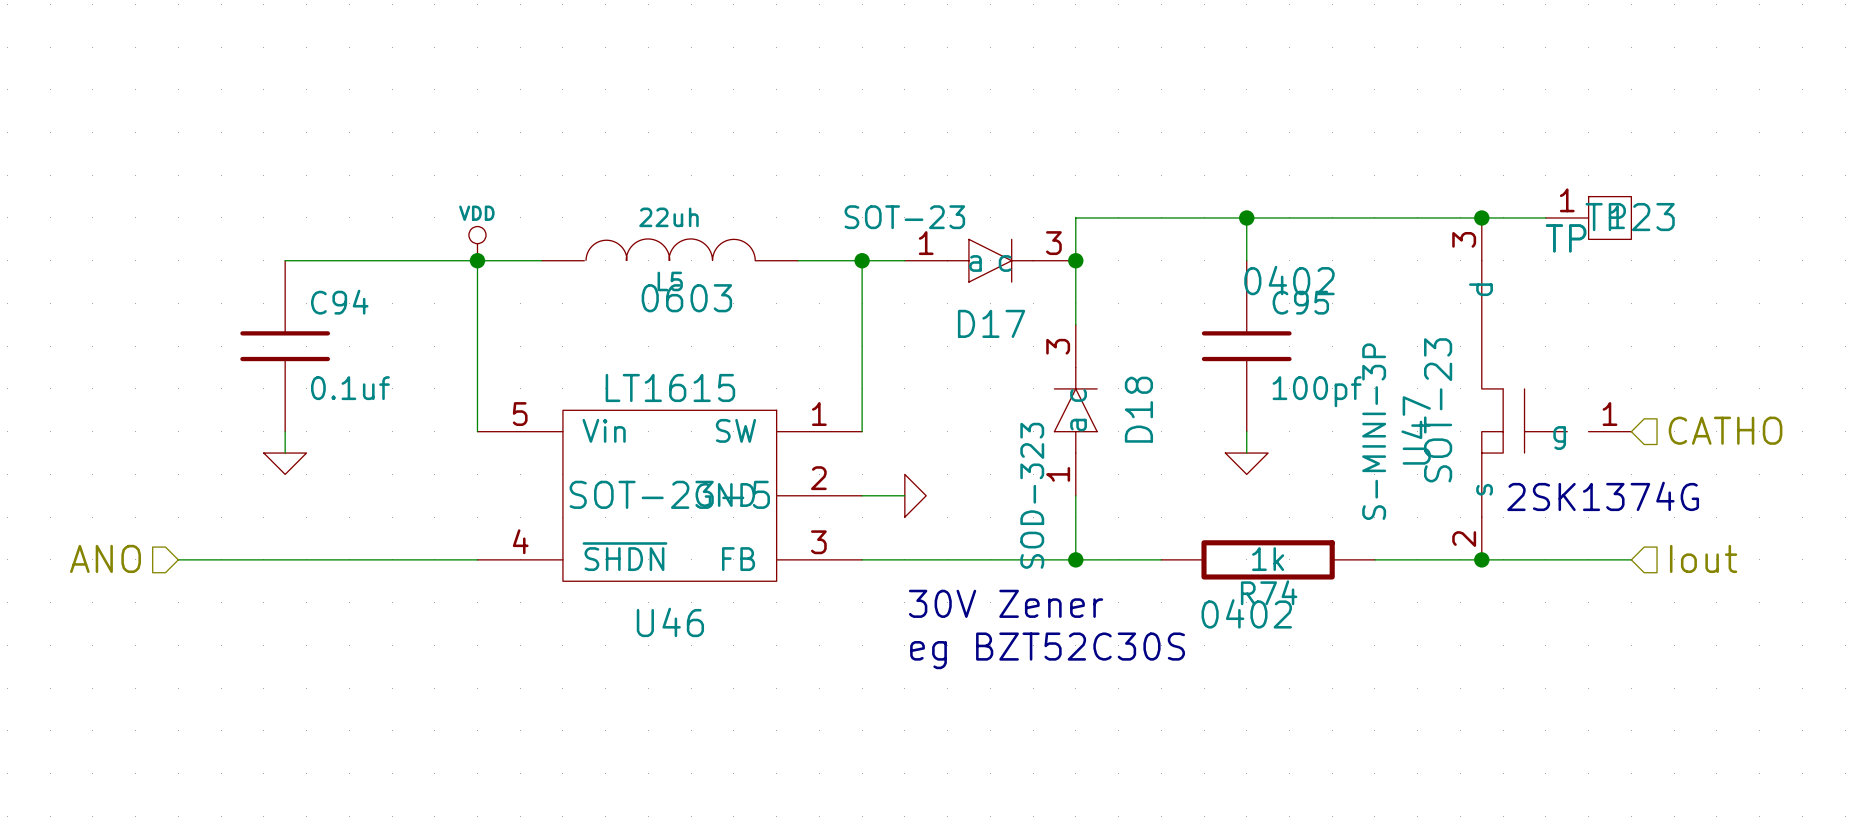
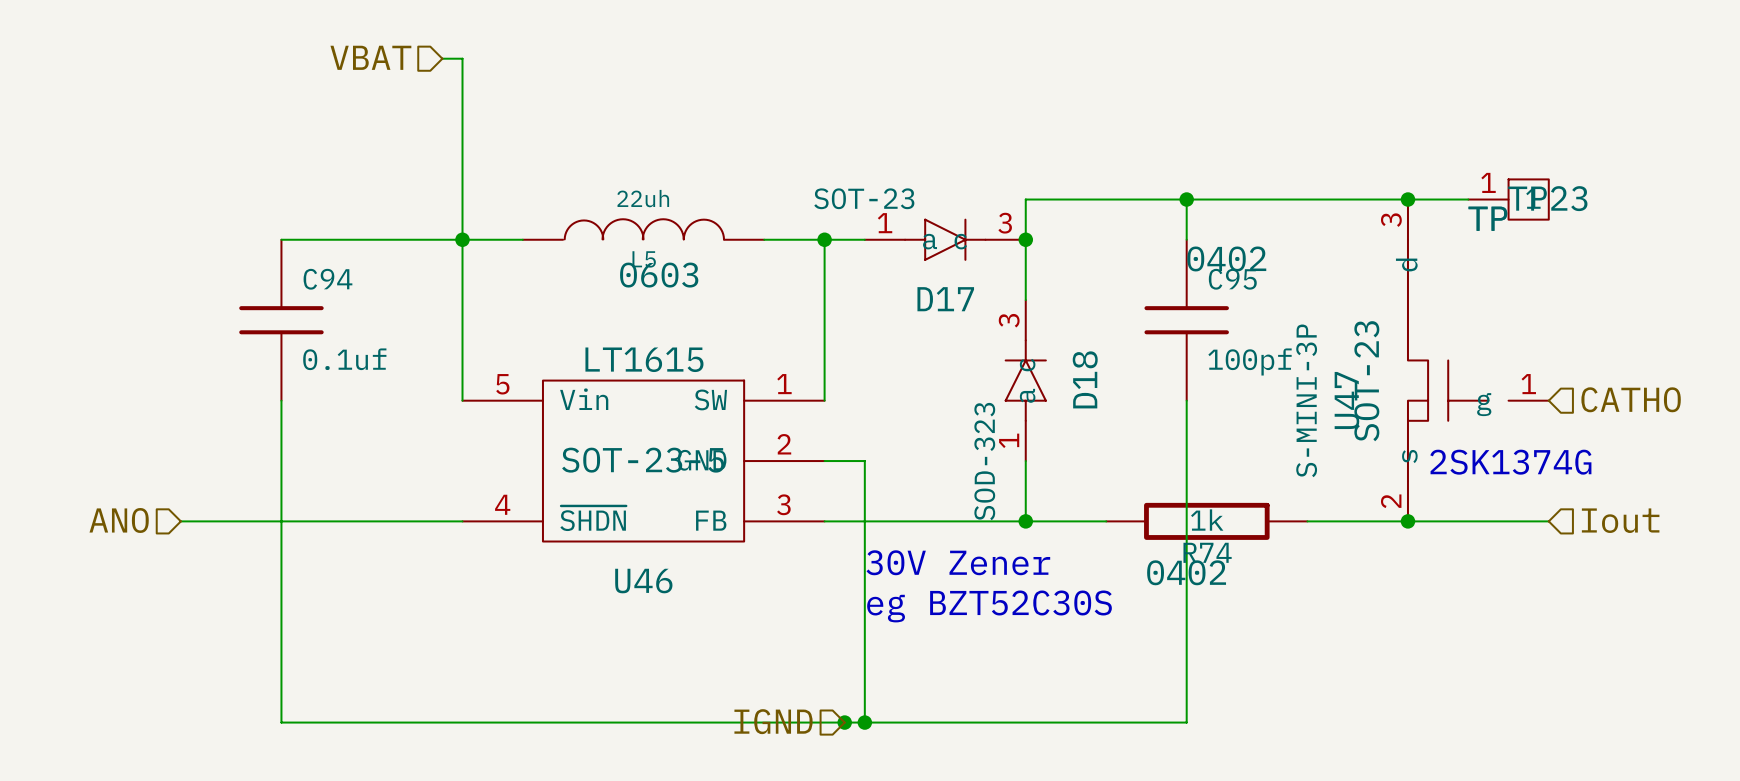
hierarchical label: none -> VBAT (370, 57)
wire: none -> (442, 58) (462, 58) (462, 239)
power symbol: VDD (477, 243) -> none
wire: none -> (281, 420) (281, 722) (1186, 722) (1186, 420)
power symbol: (285, 463) -> none
power symbol: (1246, 463) -> none
wire: none -> (864, 461) (864, 722)
power symbol: (915, 495) -> none
hierarchical label: none -> IGND (773, 721)
junction: none -> (844, 722)
junction: none -> (864, 722)

